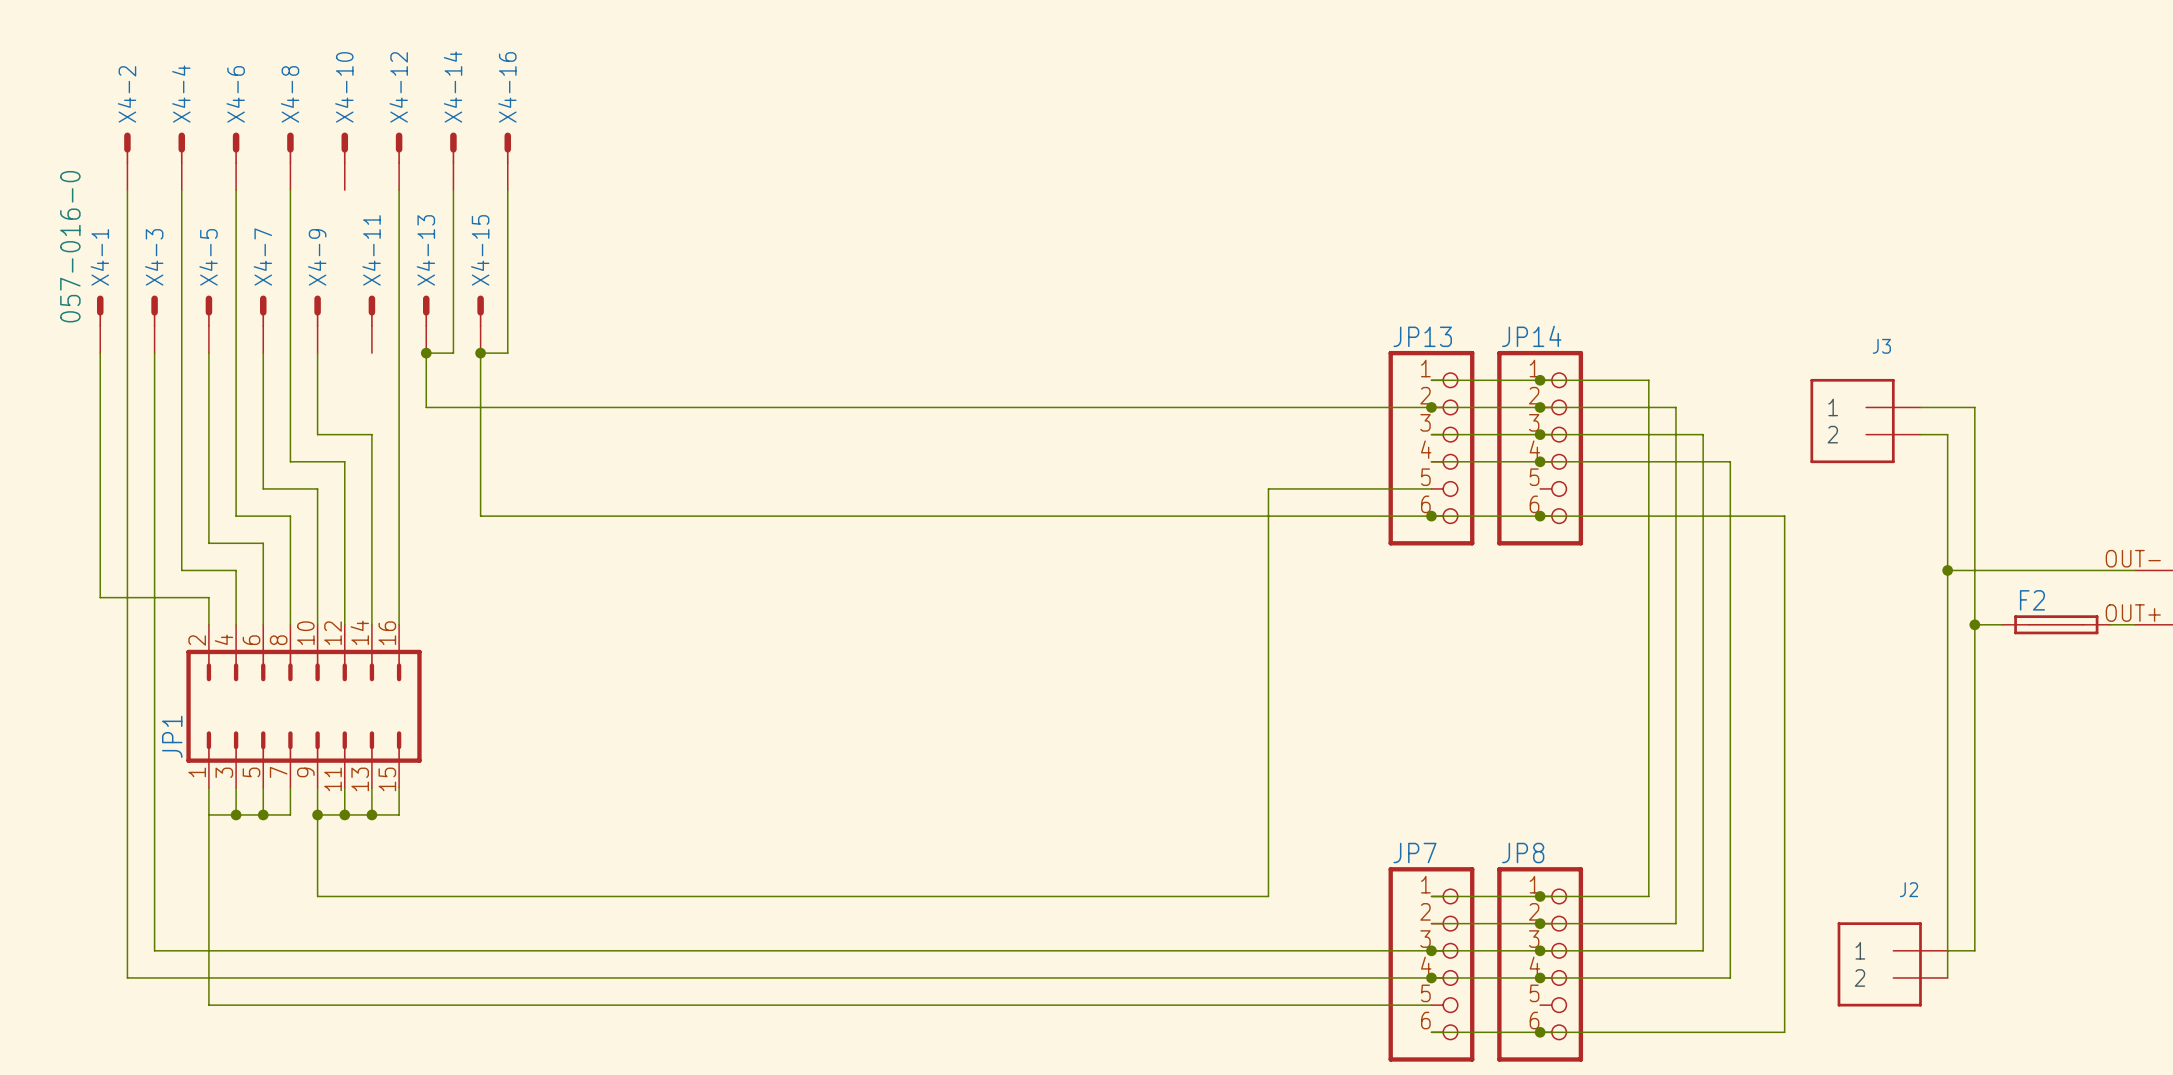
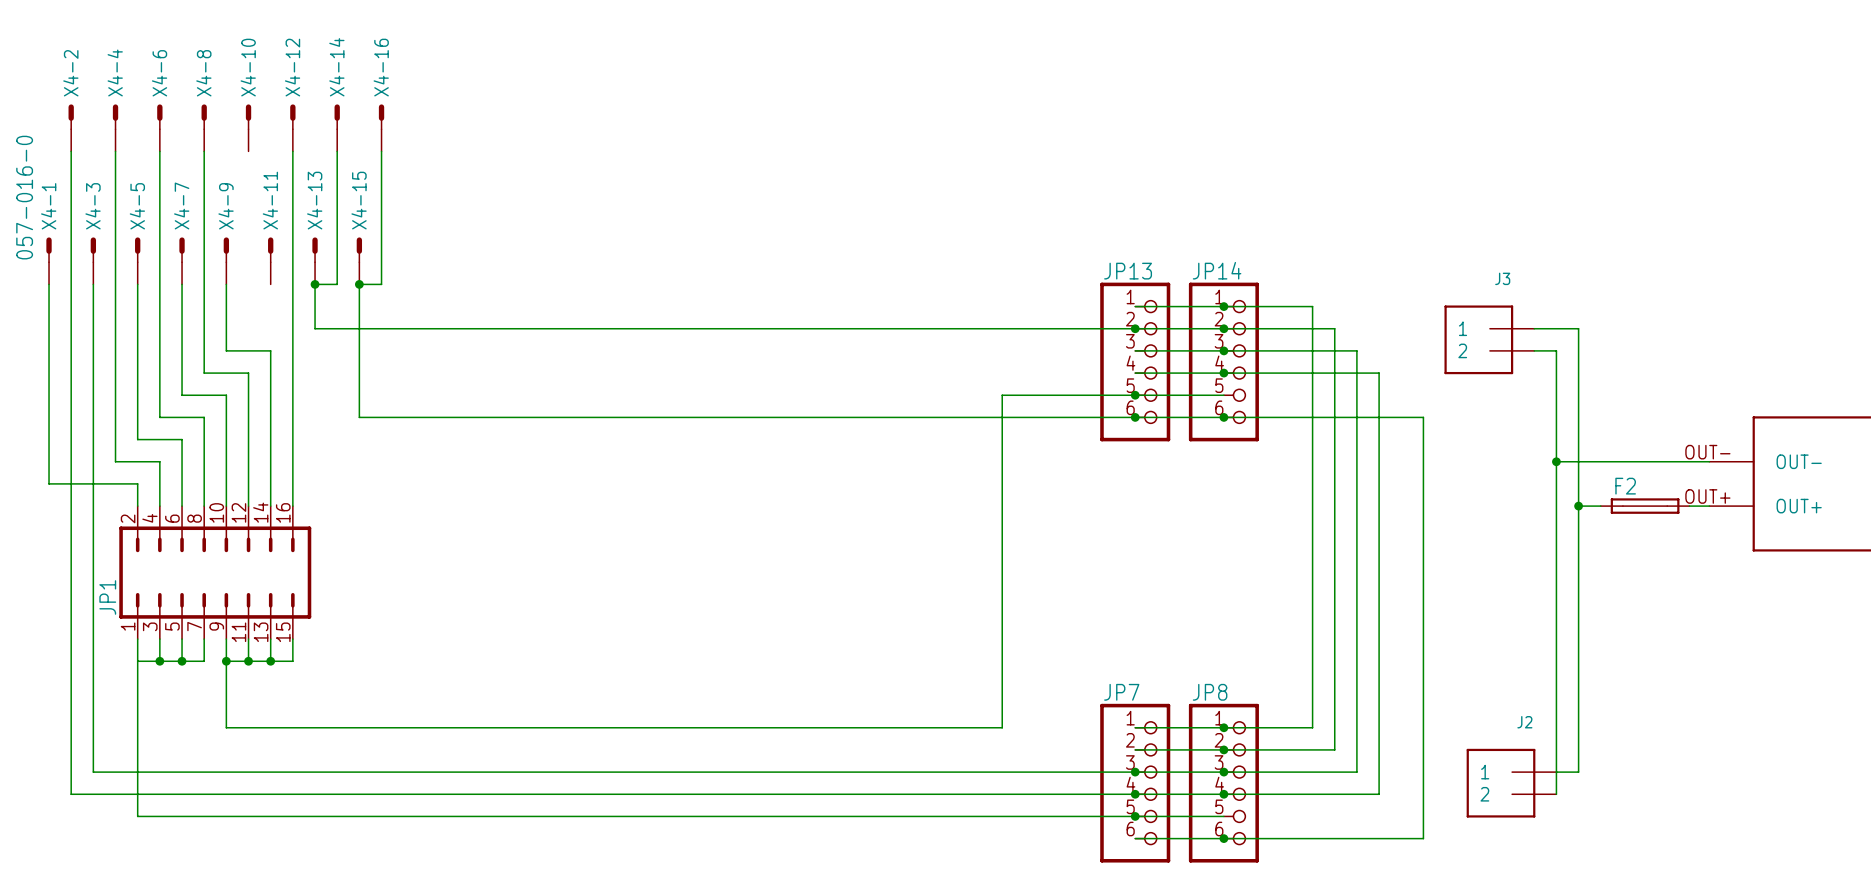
wire: none -> (1135, 395) (1223, 395)
junction: none -> (1135, 395)
wire: none -> (1135, 816) (1223, 816)
junction: none -> (1135, 816)

